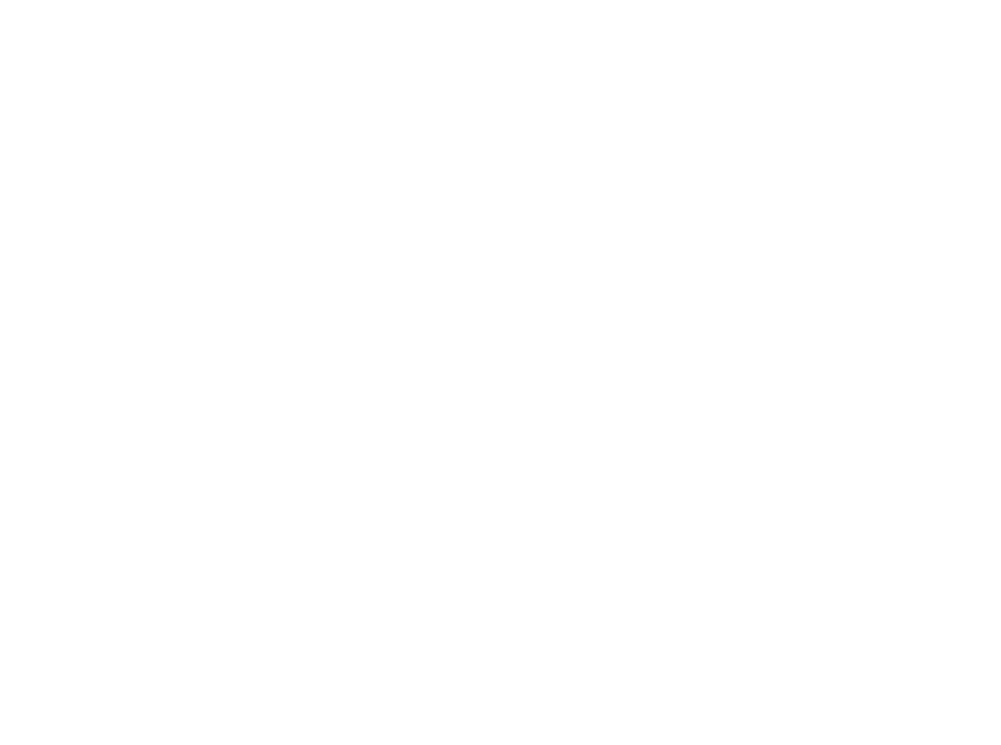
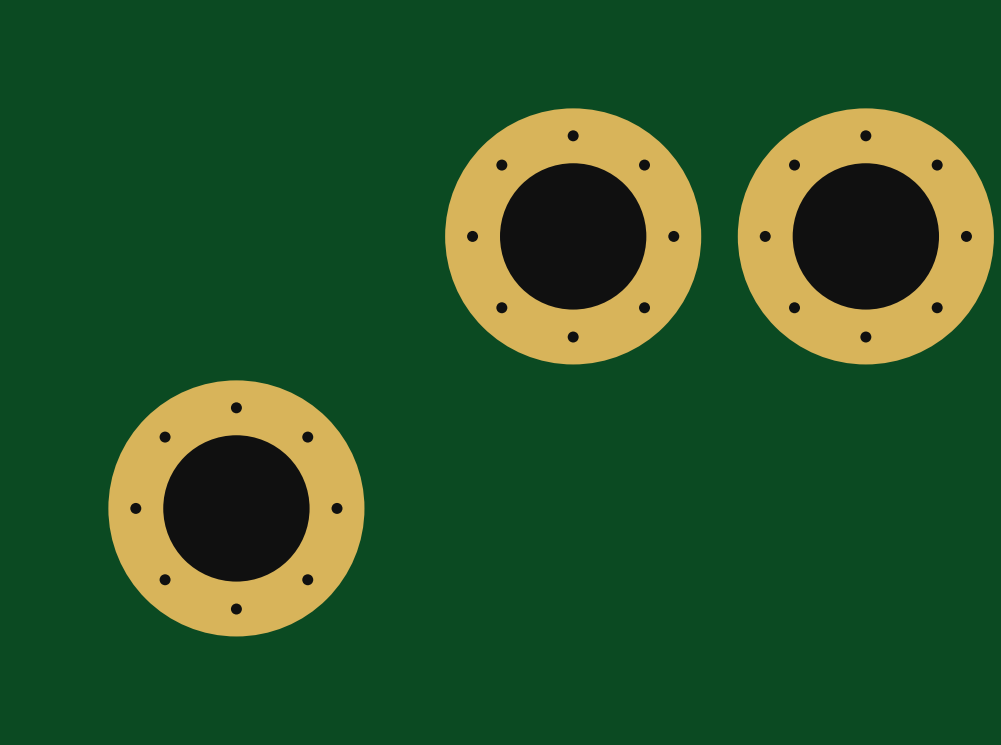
part: none -> (573, 236)
part: none -> (865, 236)
part: none -> (236, 508)

